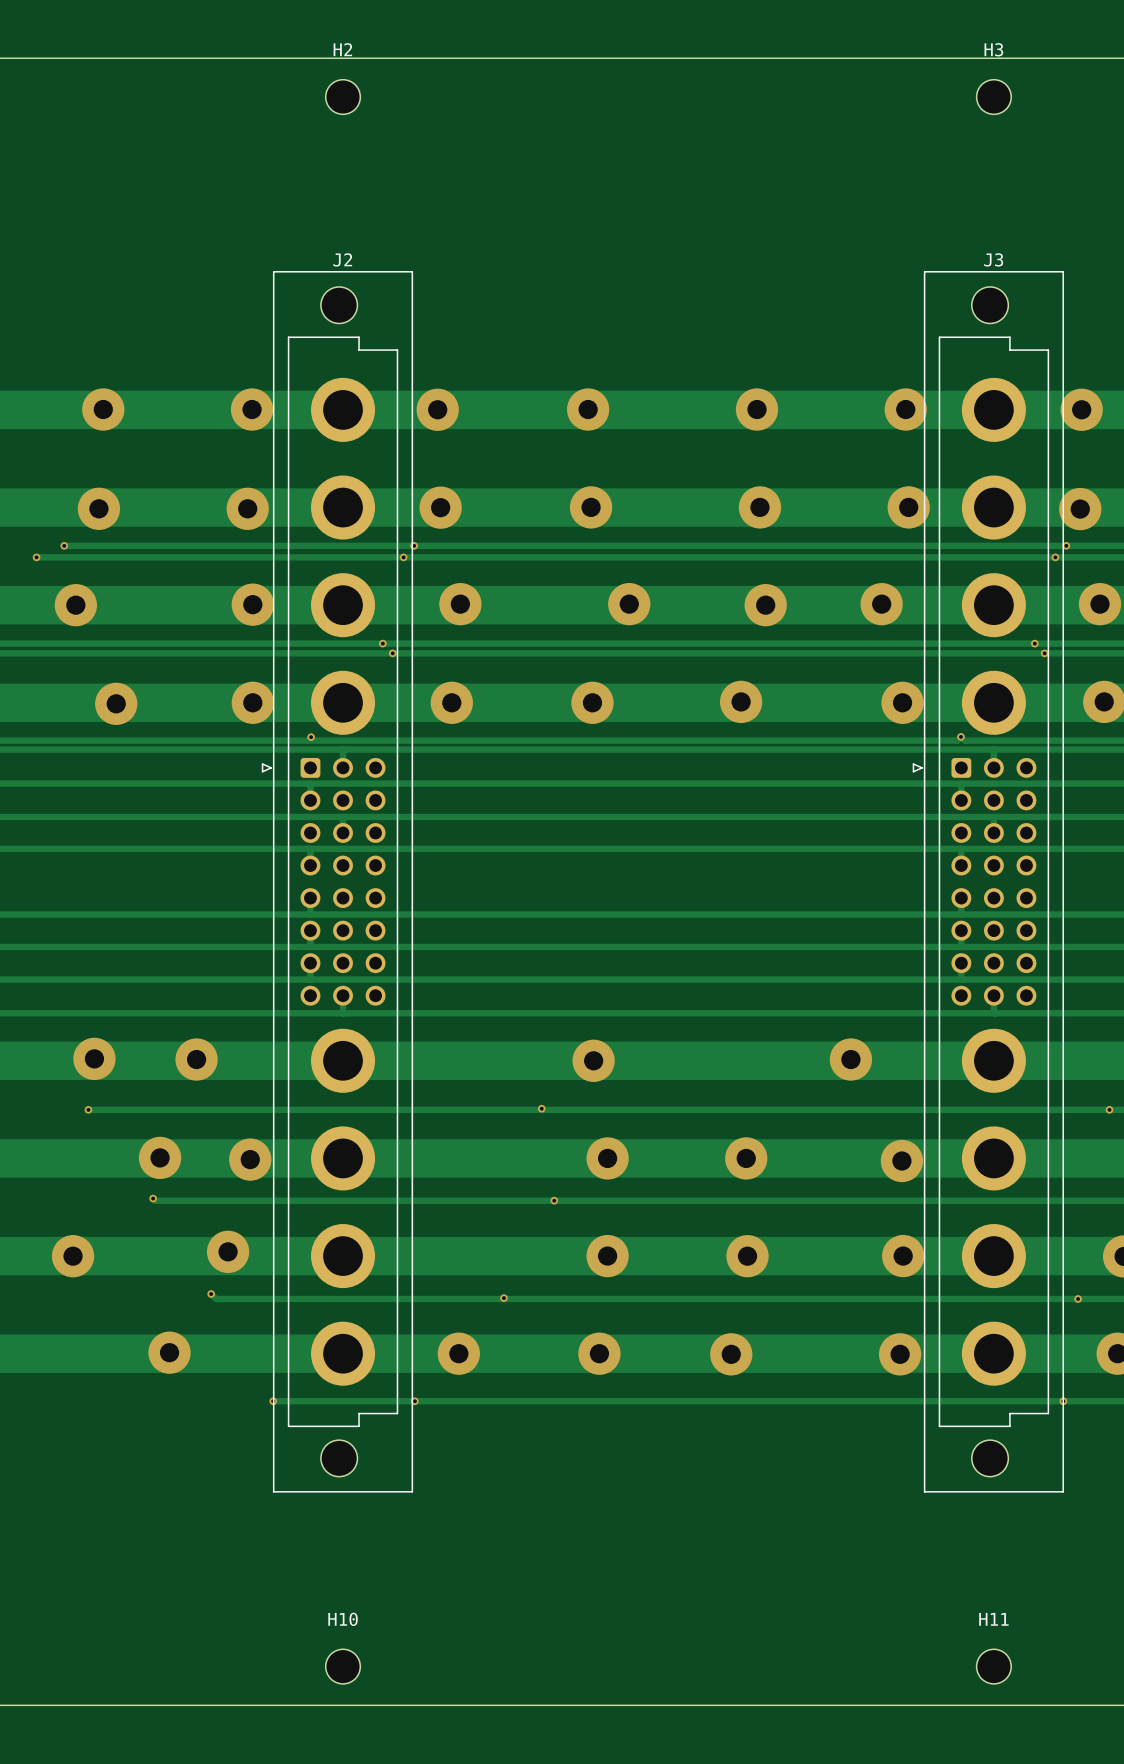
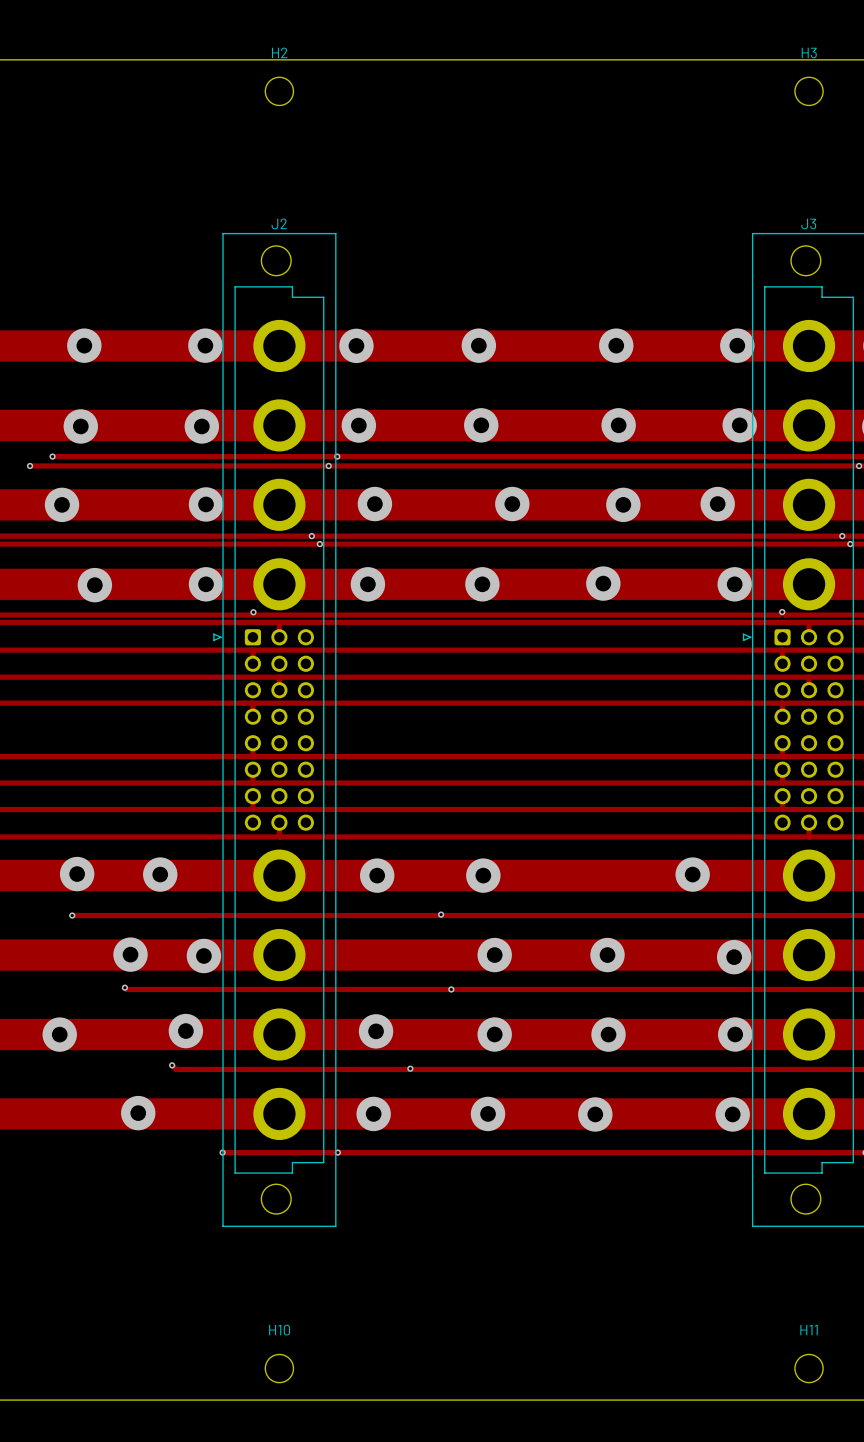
via: none -> (377, 875)
via: none -> (376, 1031)

